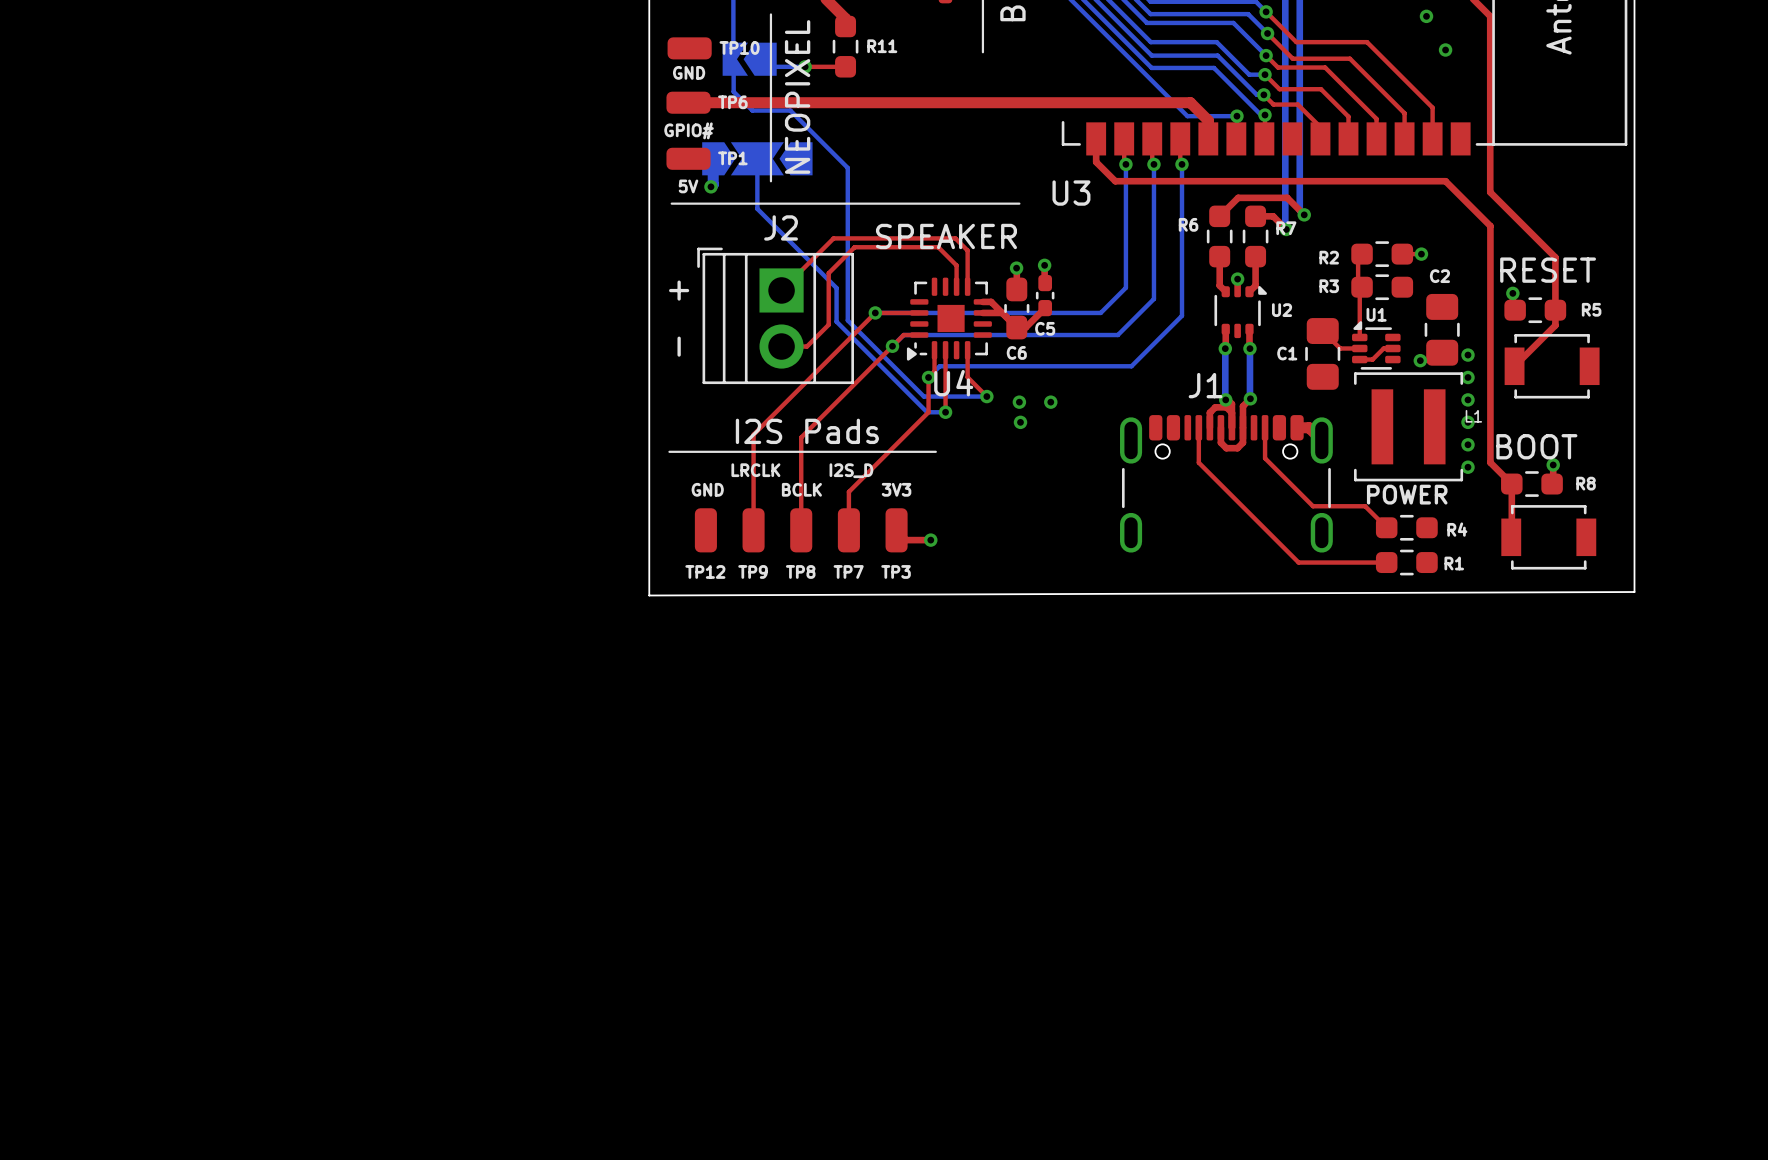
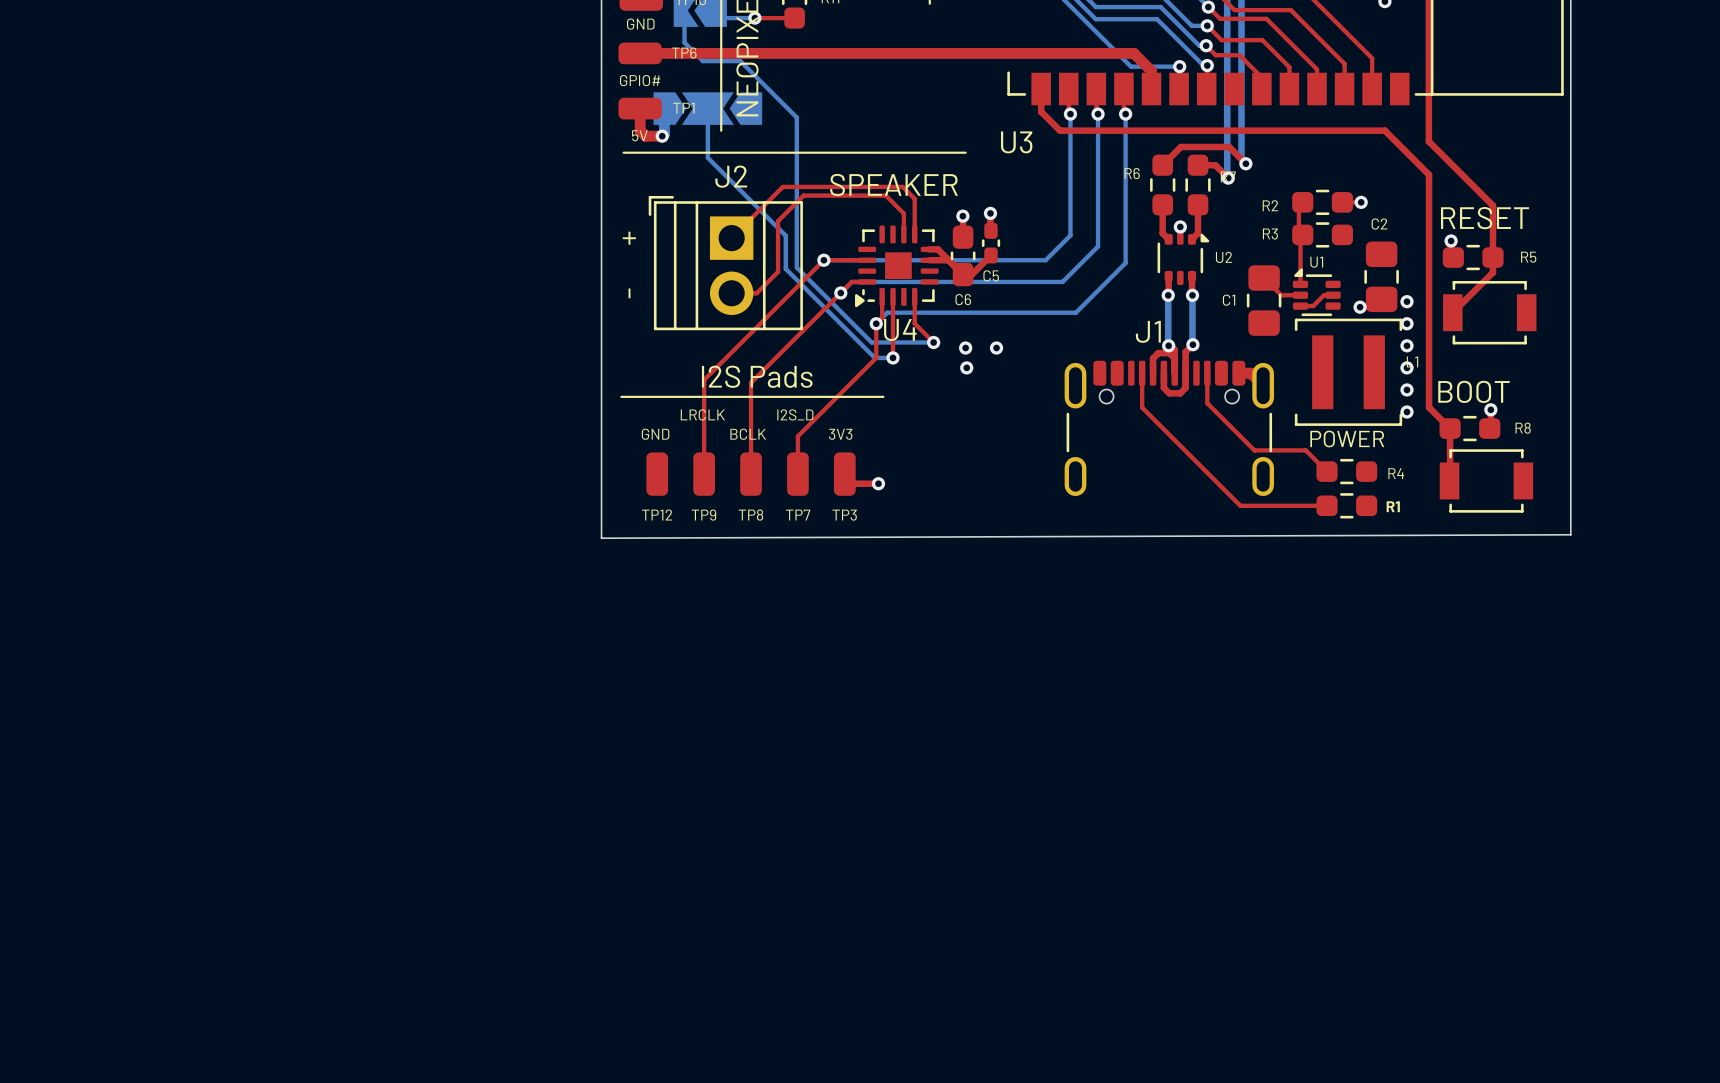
top track: none -> (640, 108) (640, 130) (645, 136) (662, 136)

